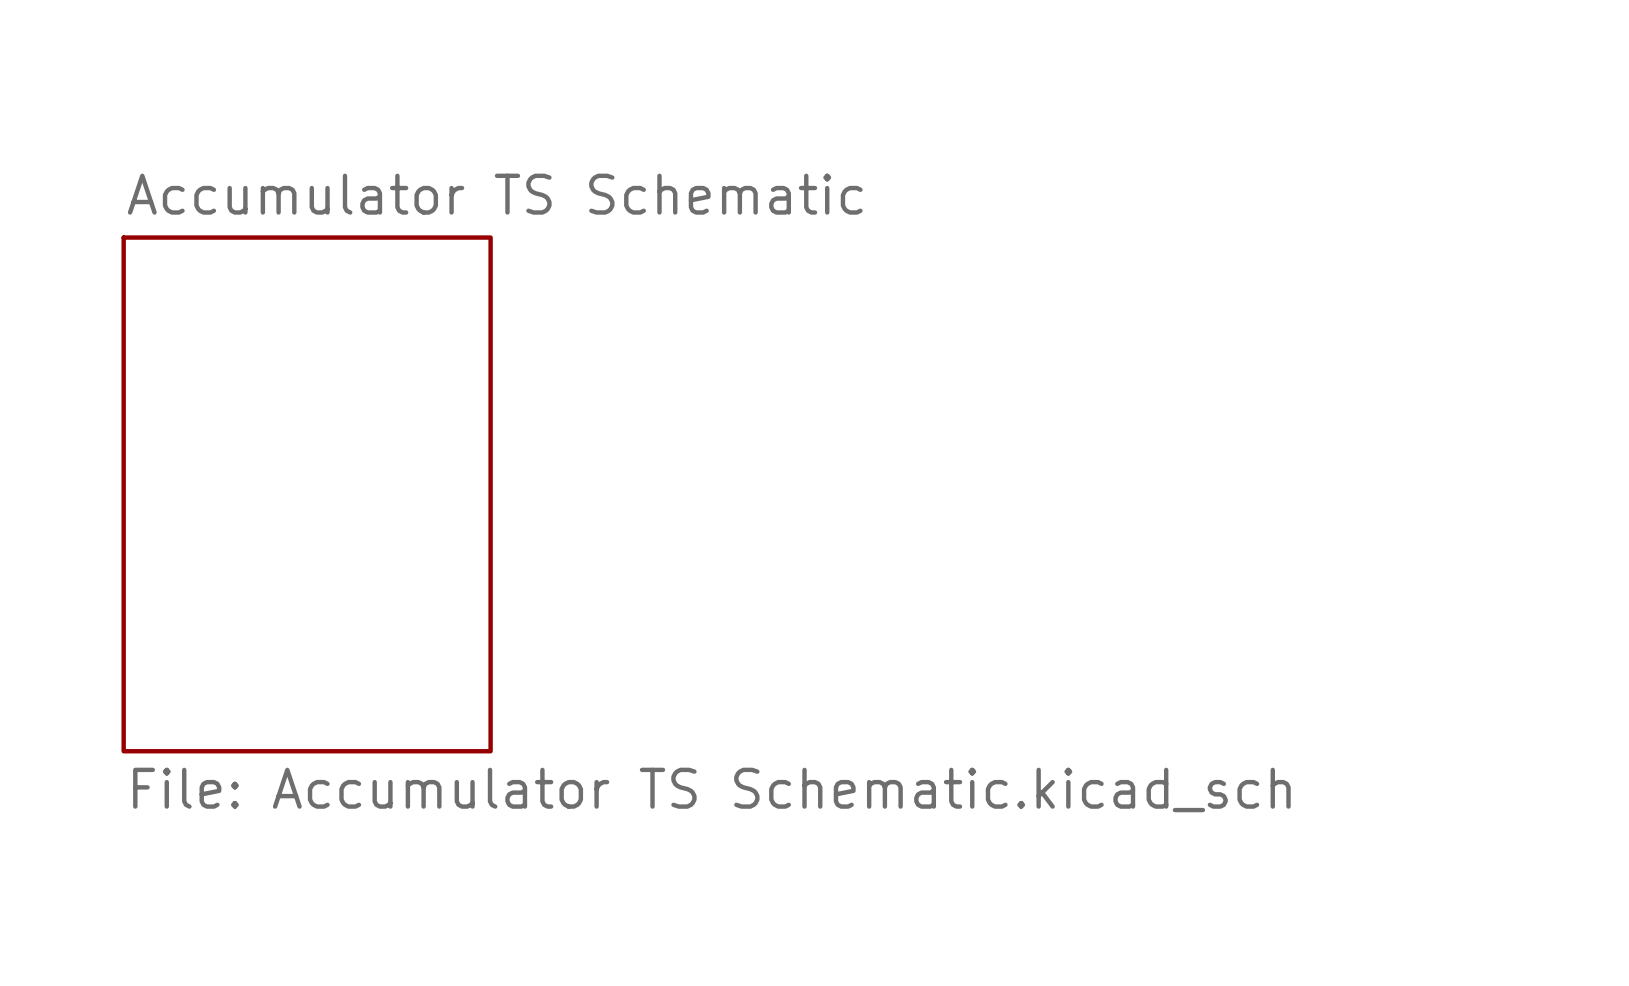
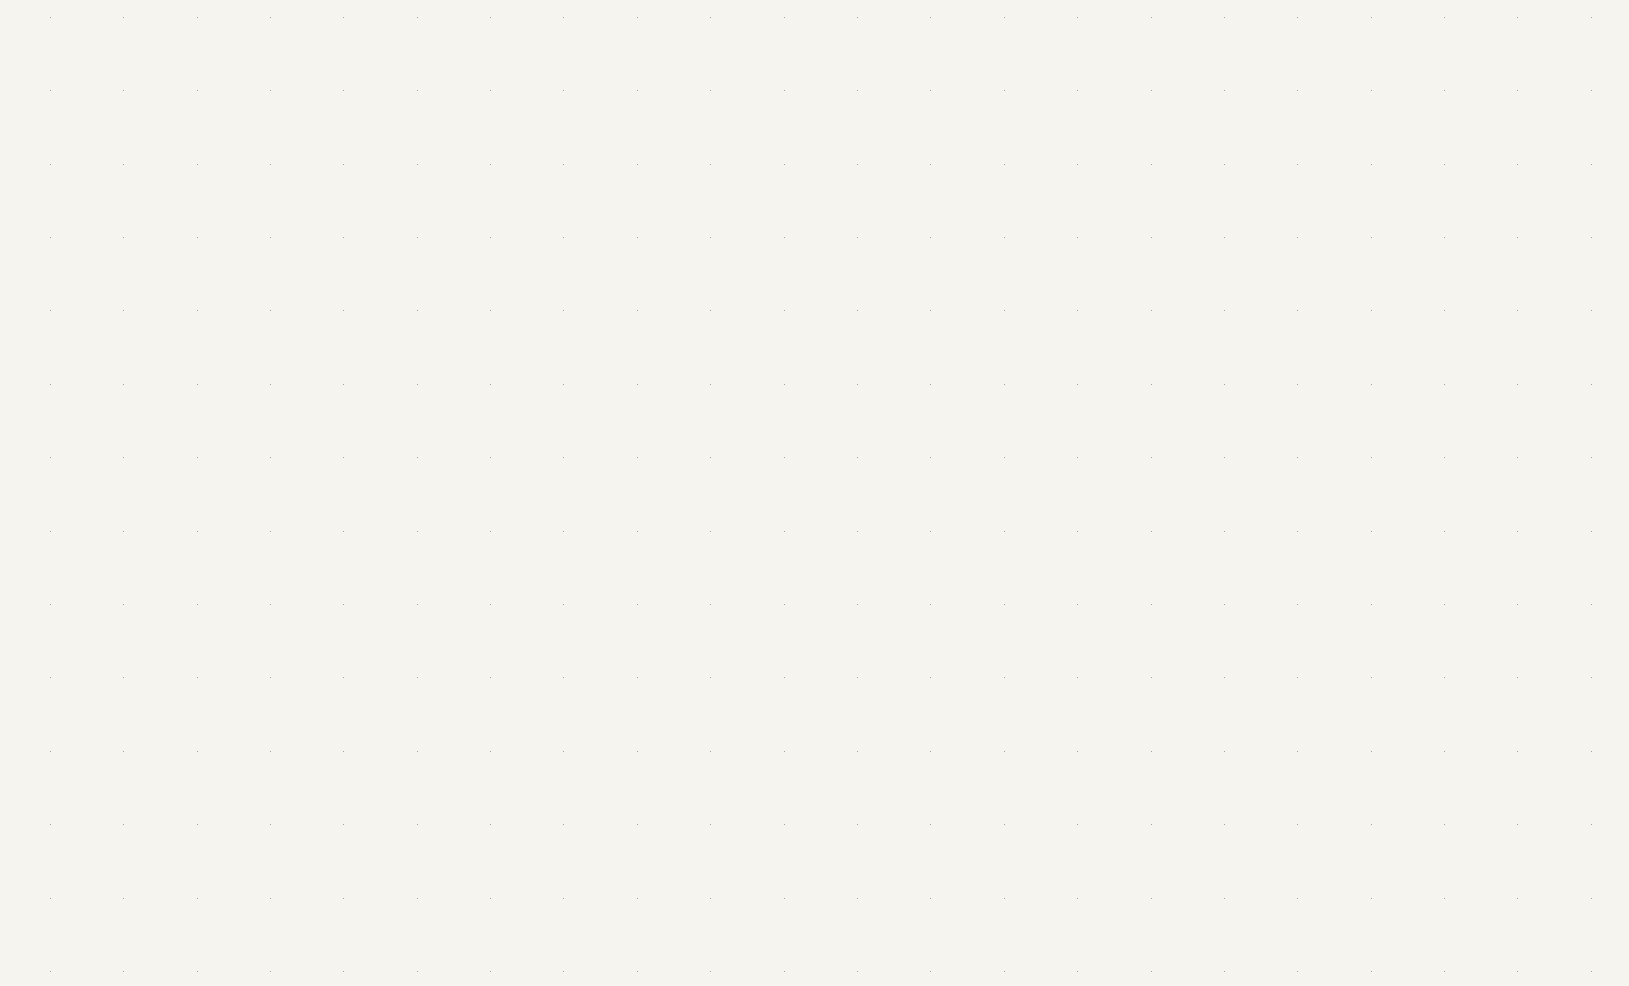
sheet Accumulator TS Schematic: File: Accumulator TS Schematic.kicad_sch (307, 494) -> none

